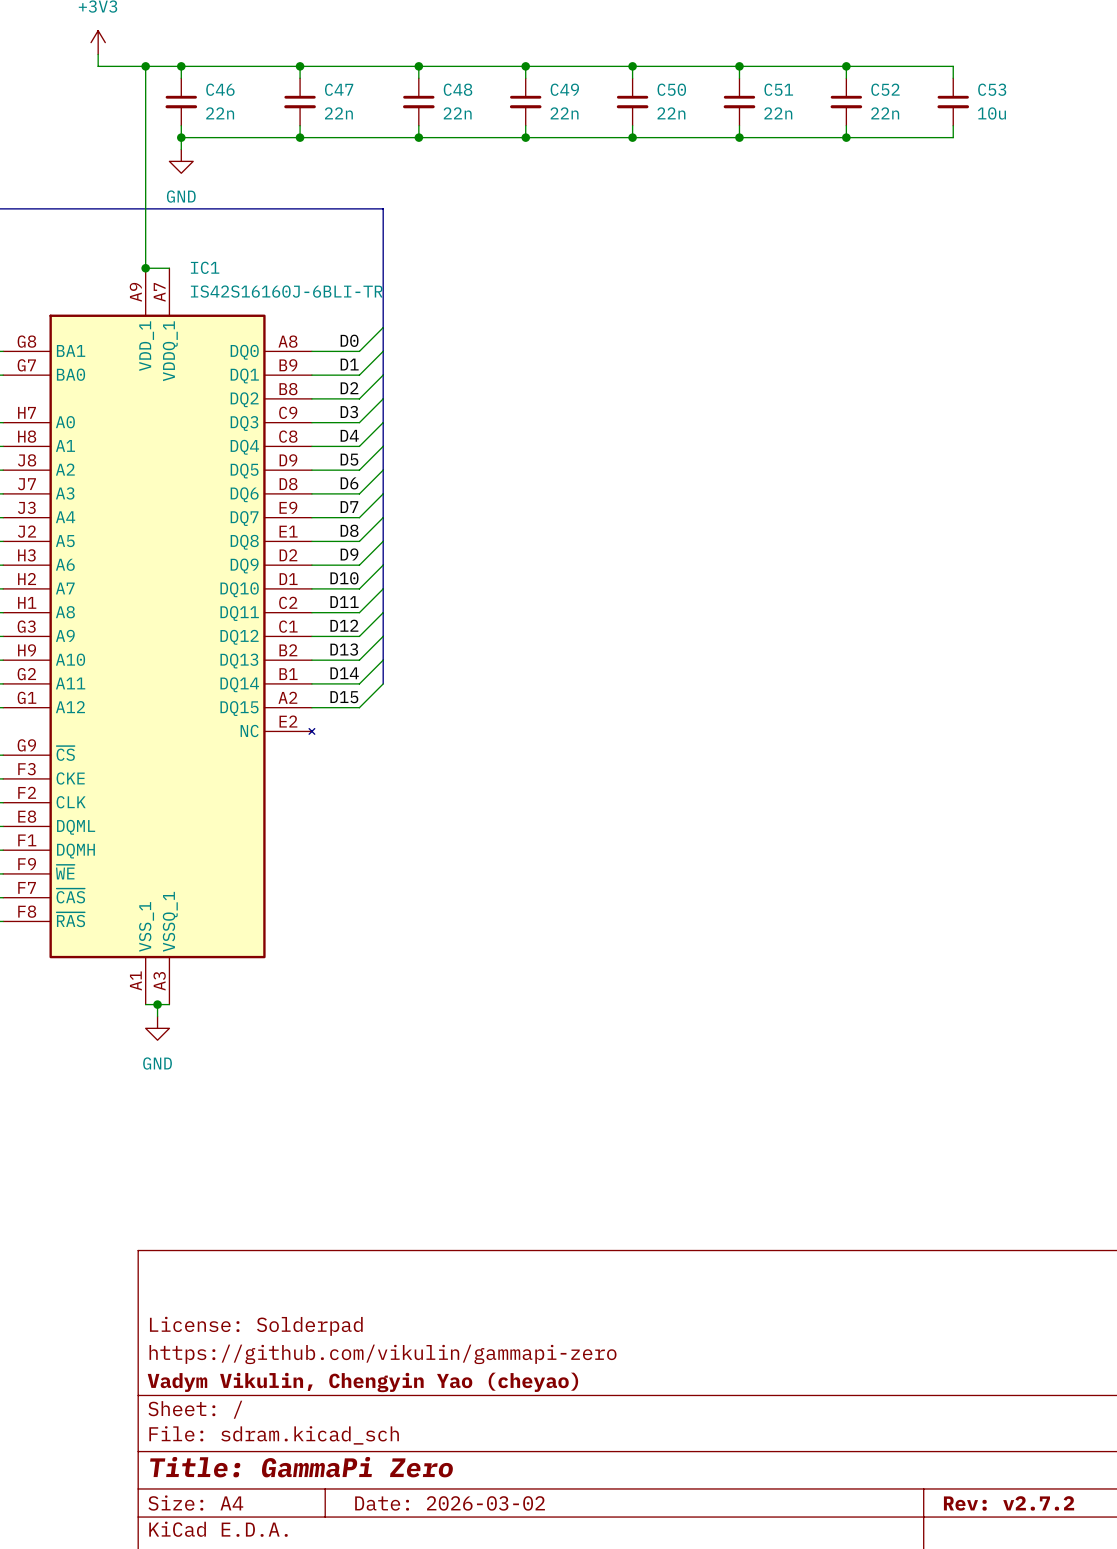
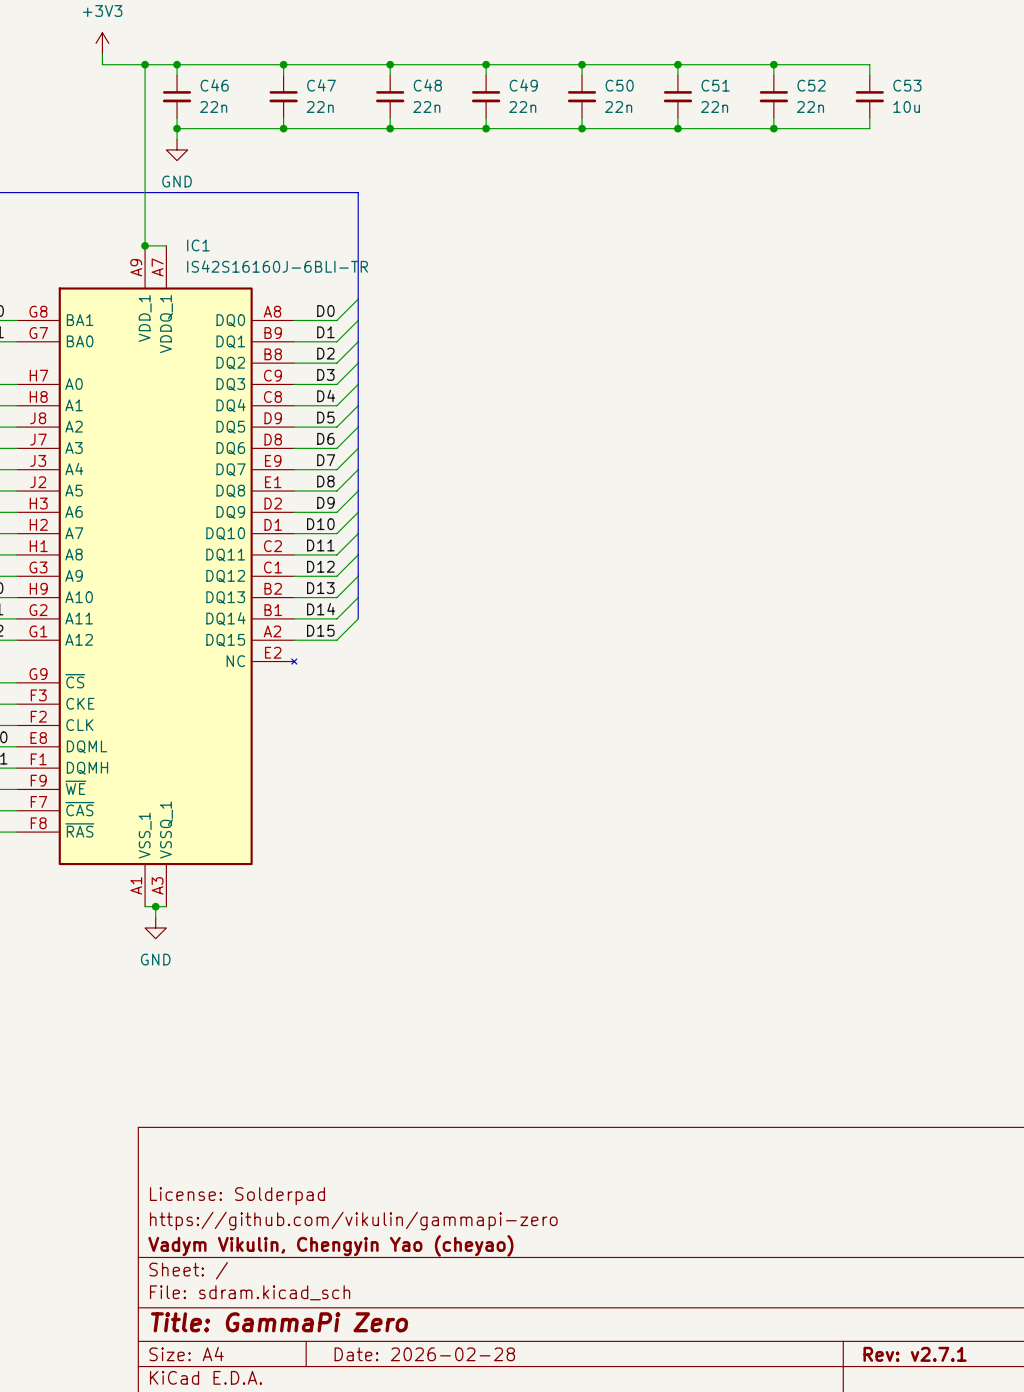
title block: Date: 2026-03-02 (450, 1503) -> Date: 2026-02-28 (424, 1354)
title block: Rev: v2.7.2 (1009, 1503) -> Rev: v2.7.1 (915, 1354)

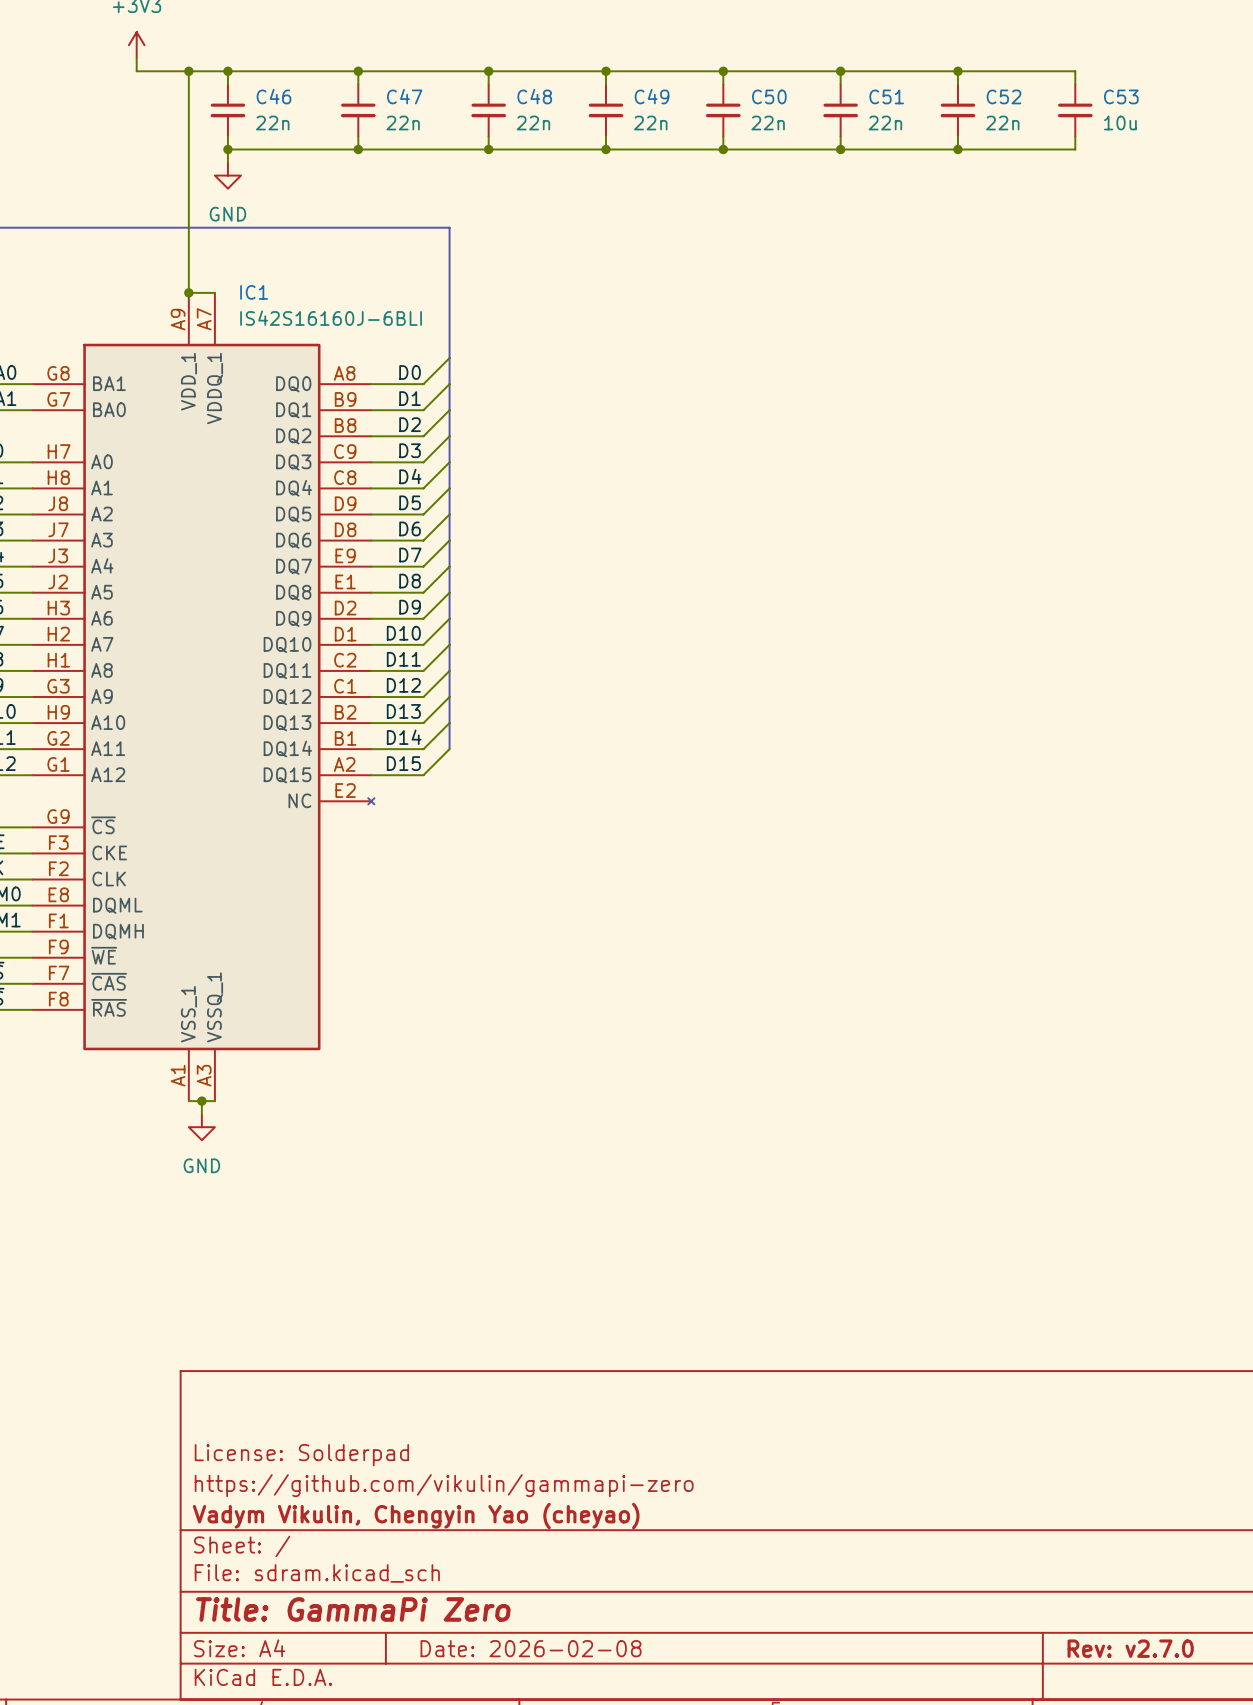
IC1 value: IS42S16160J-6BLI-TR (277, 266) -> IS42S16160J-6BLI (331, 318)
title block: Date: 2026-02-28 (424, 1354) -> Date: 2026-02-08 (531, 1648)
title block: Rev: v2.7.1 (915, 1354) -> Rev: v2.7.0 (1130, 1648)

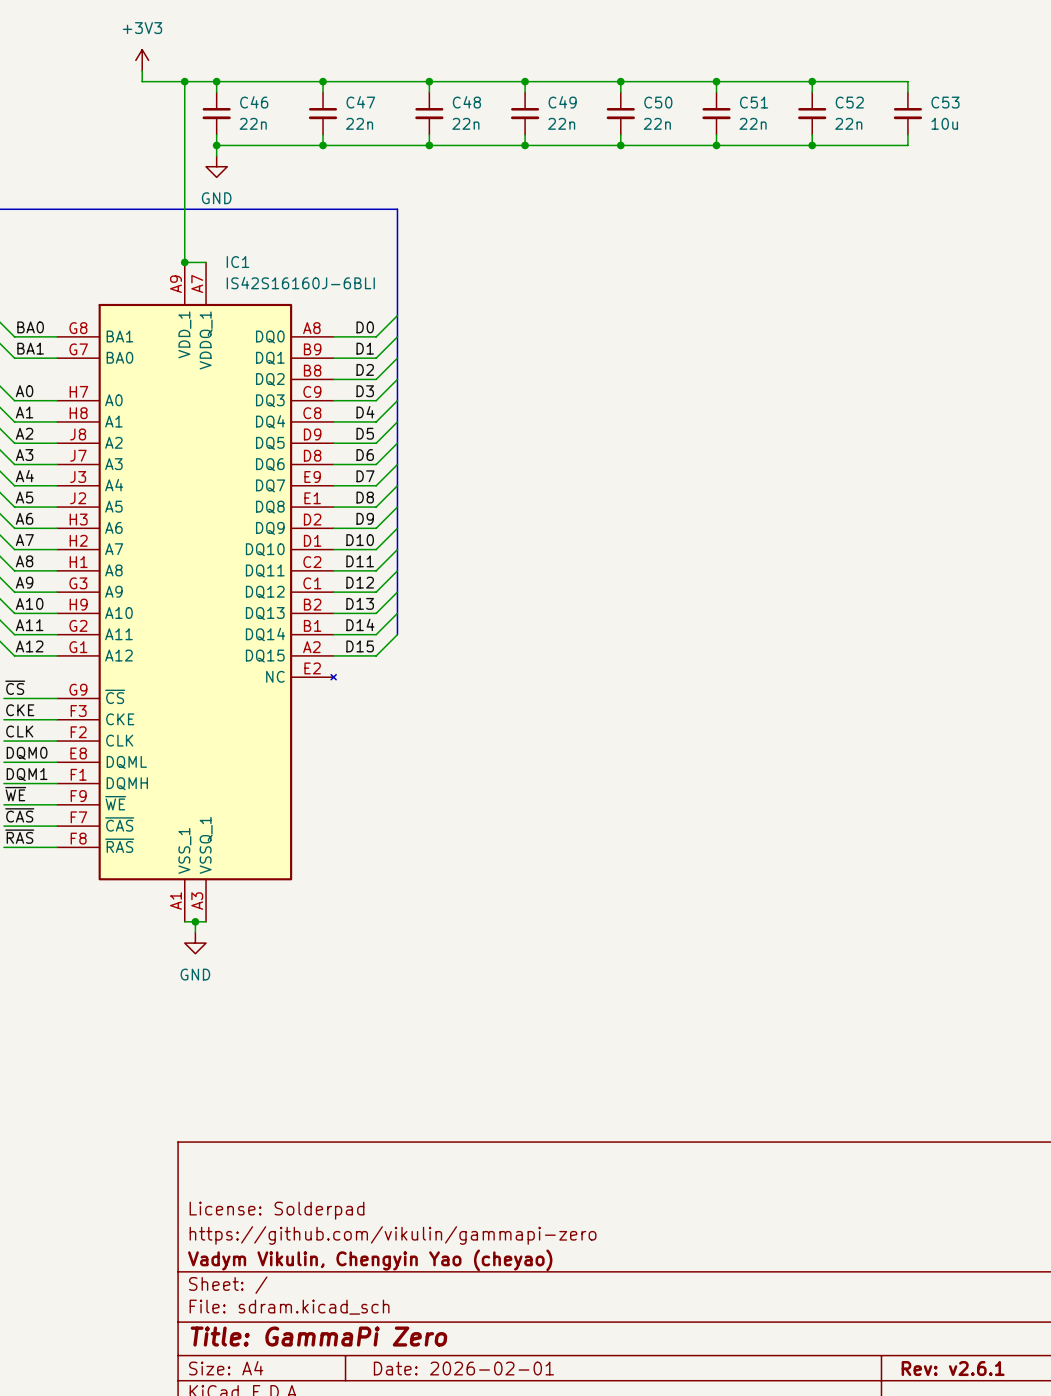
title block: Date: 2026-02-08 (531, 1648) -> Date: 2026-02-01 (463, 1368)
title block: Rev: v2.7.0 (1130, 1648) -> Rev: v2.6.1 (953, 1368)

